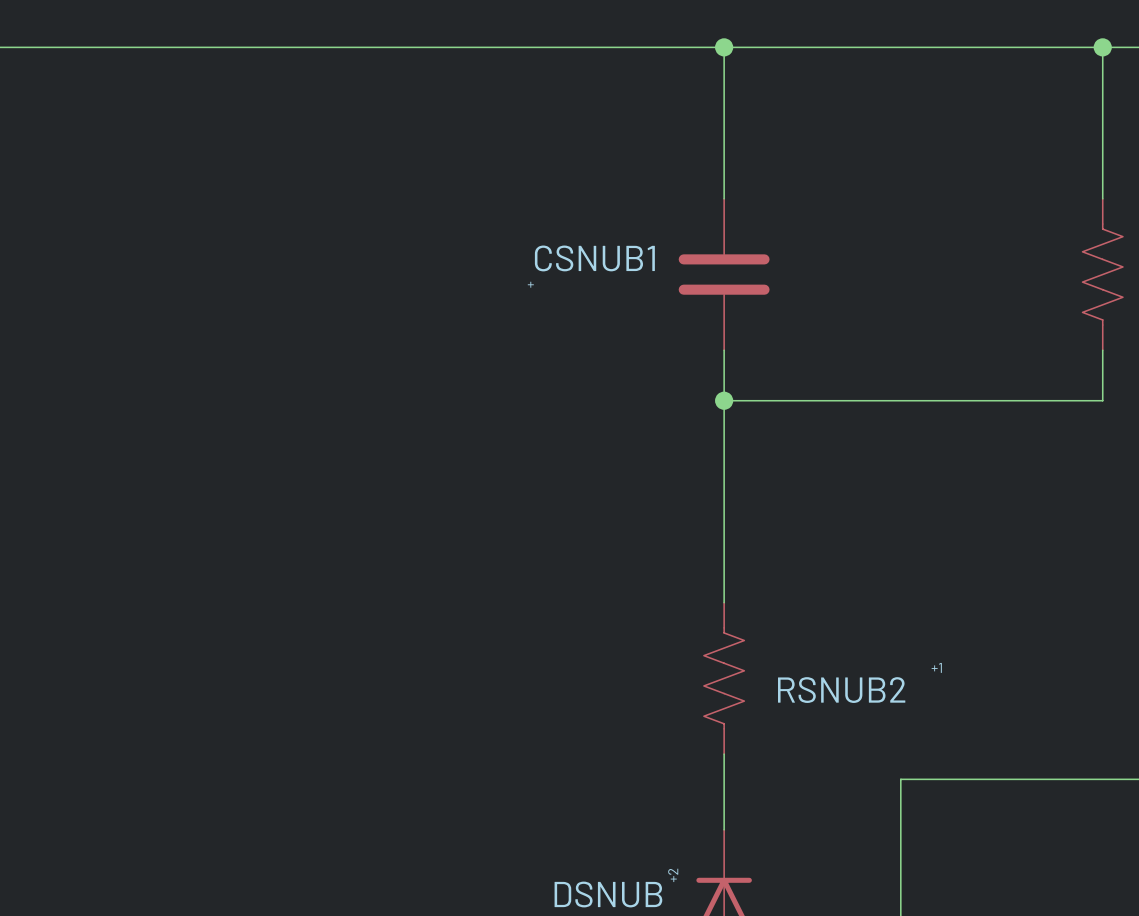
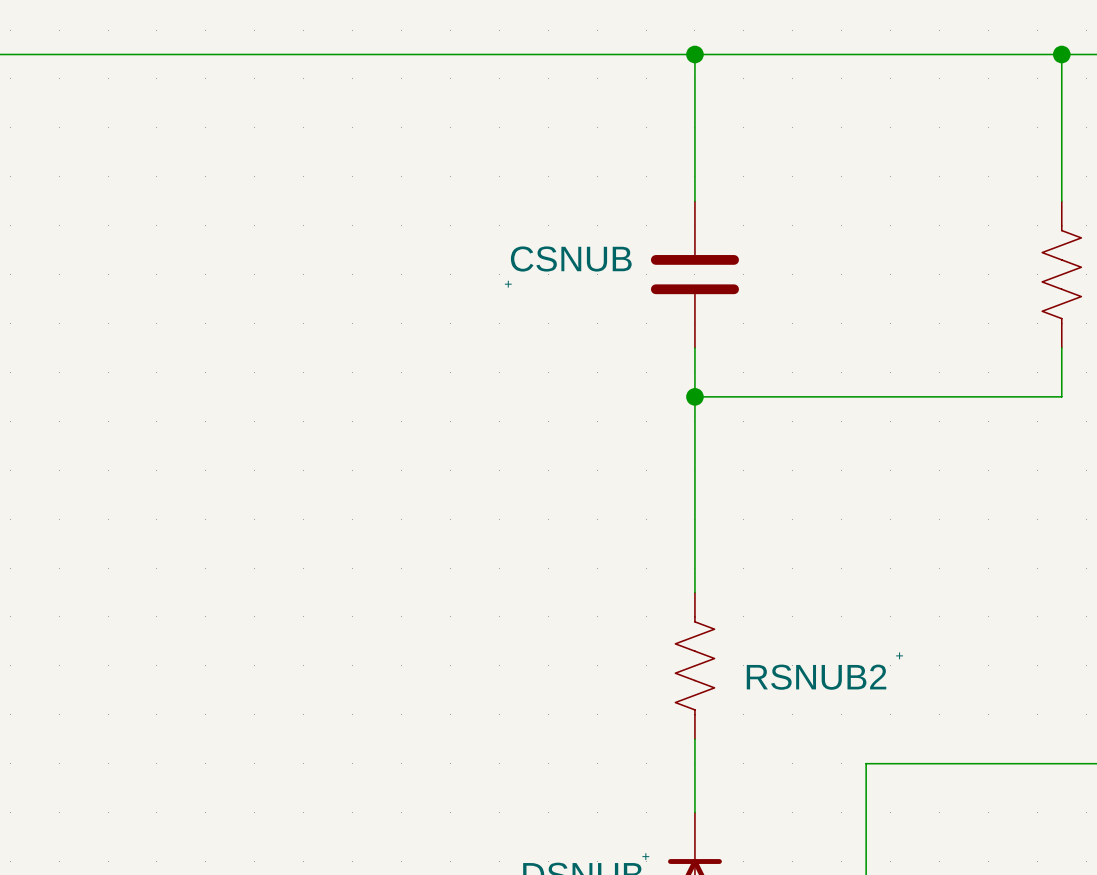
CSNUB1 name: CSNUB1 (594, 258) -> CSNUB (571, 258)
+1 name: +1 (936, 667) -> + (899, 655)
+2 name: +2 (673, 875) -> + (645, 856)

